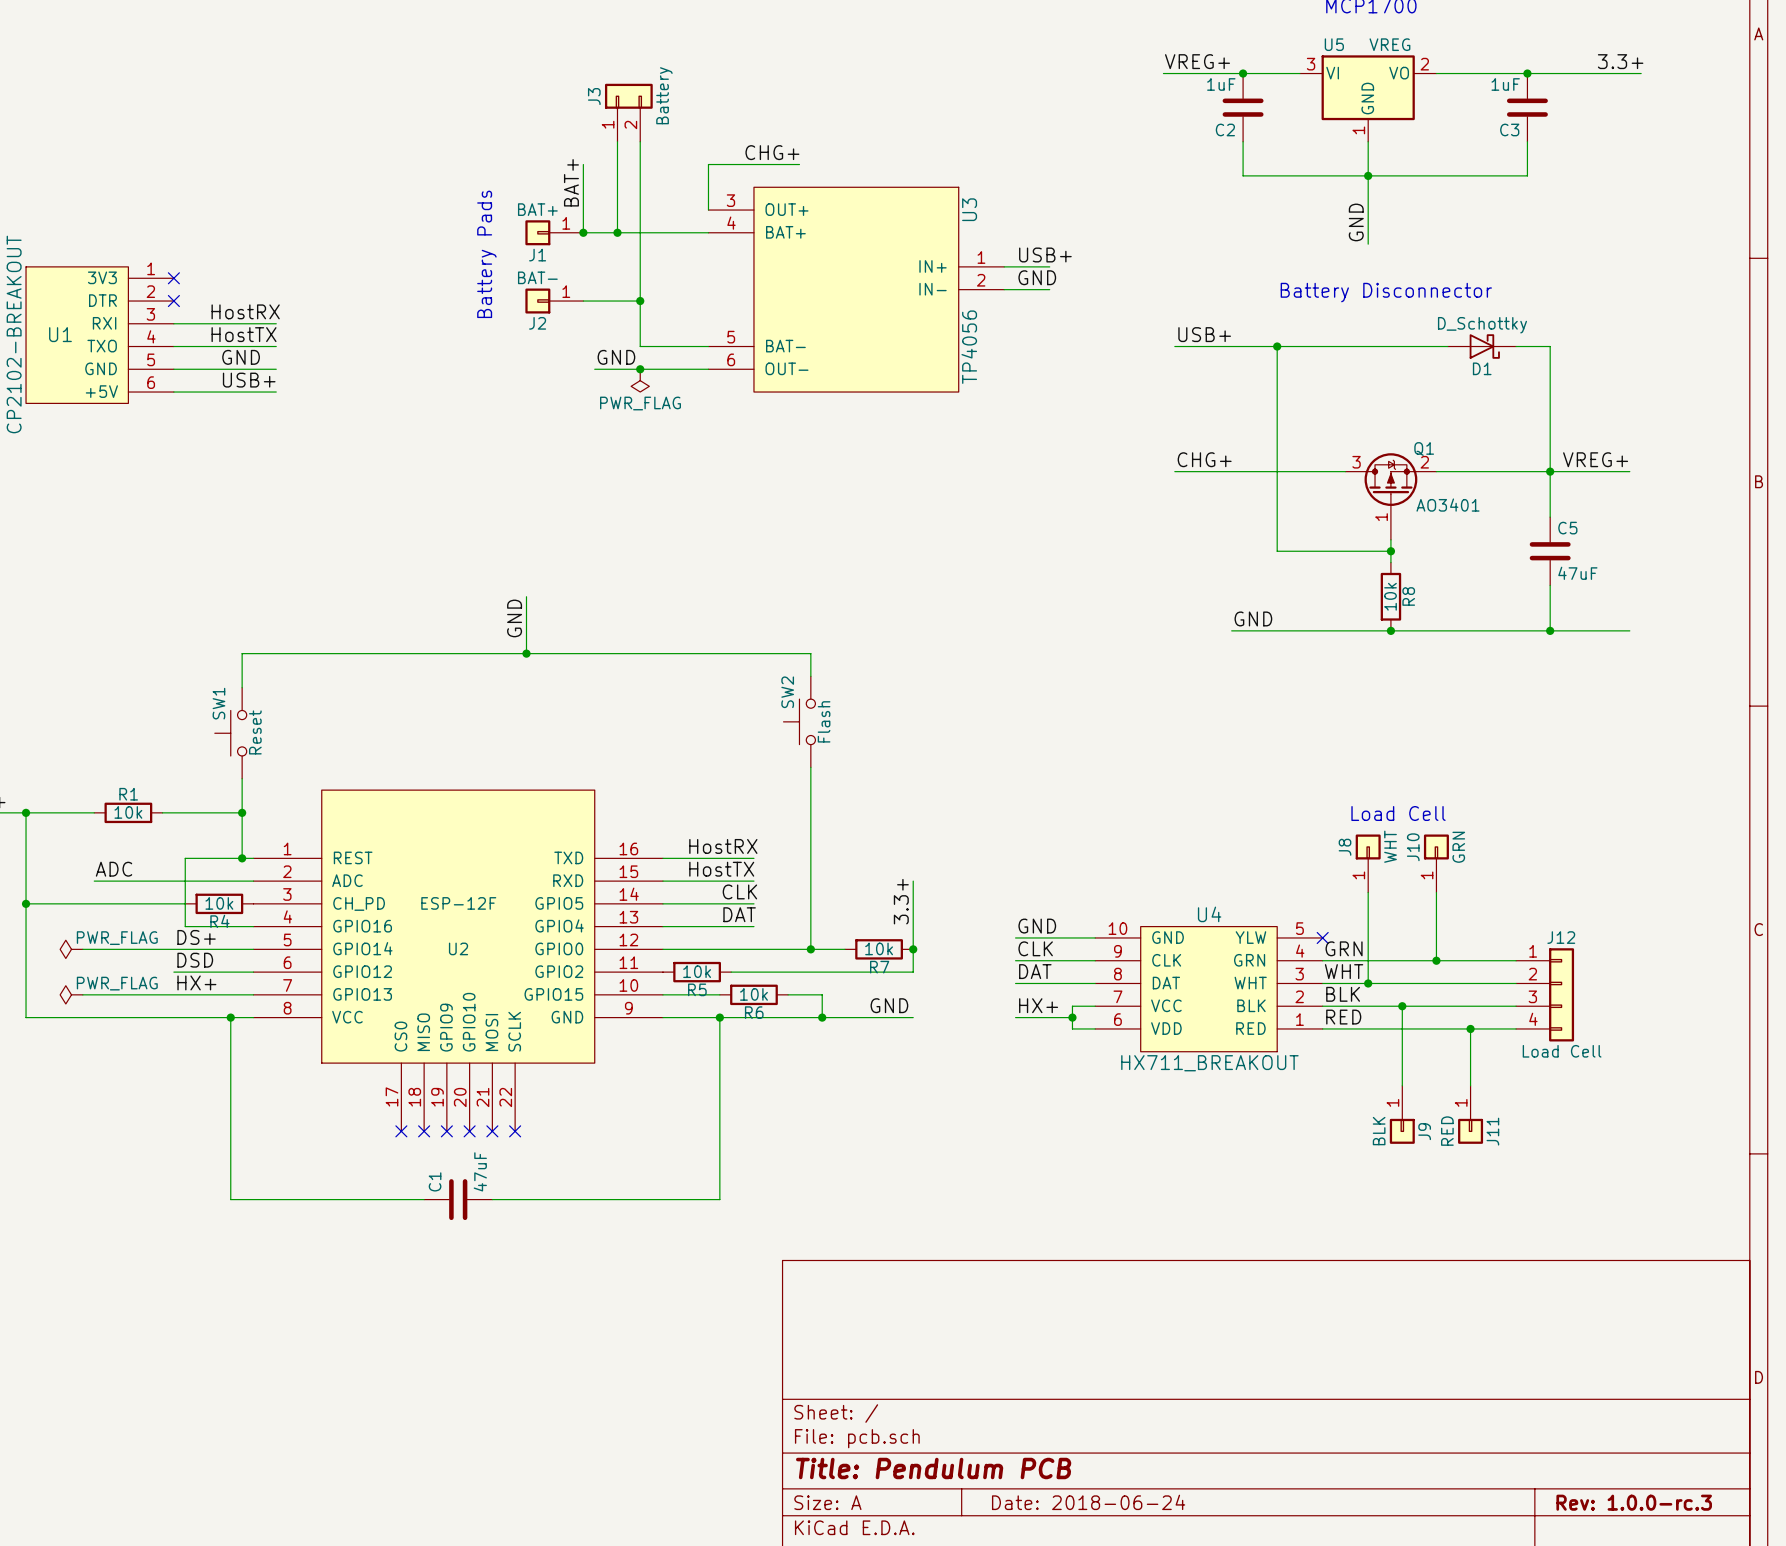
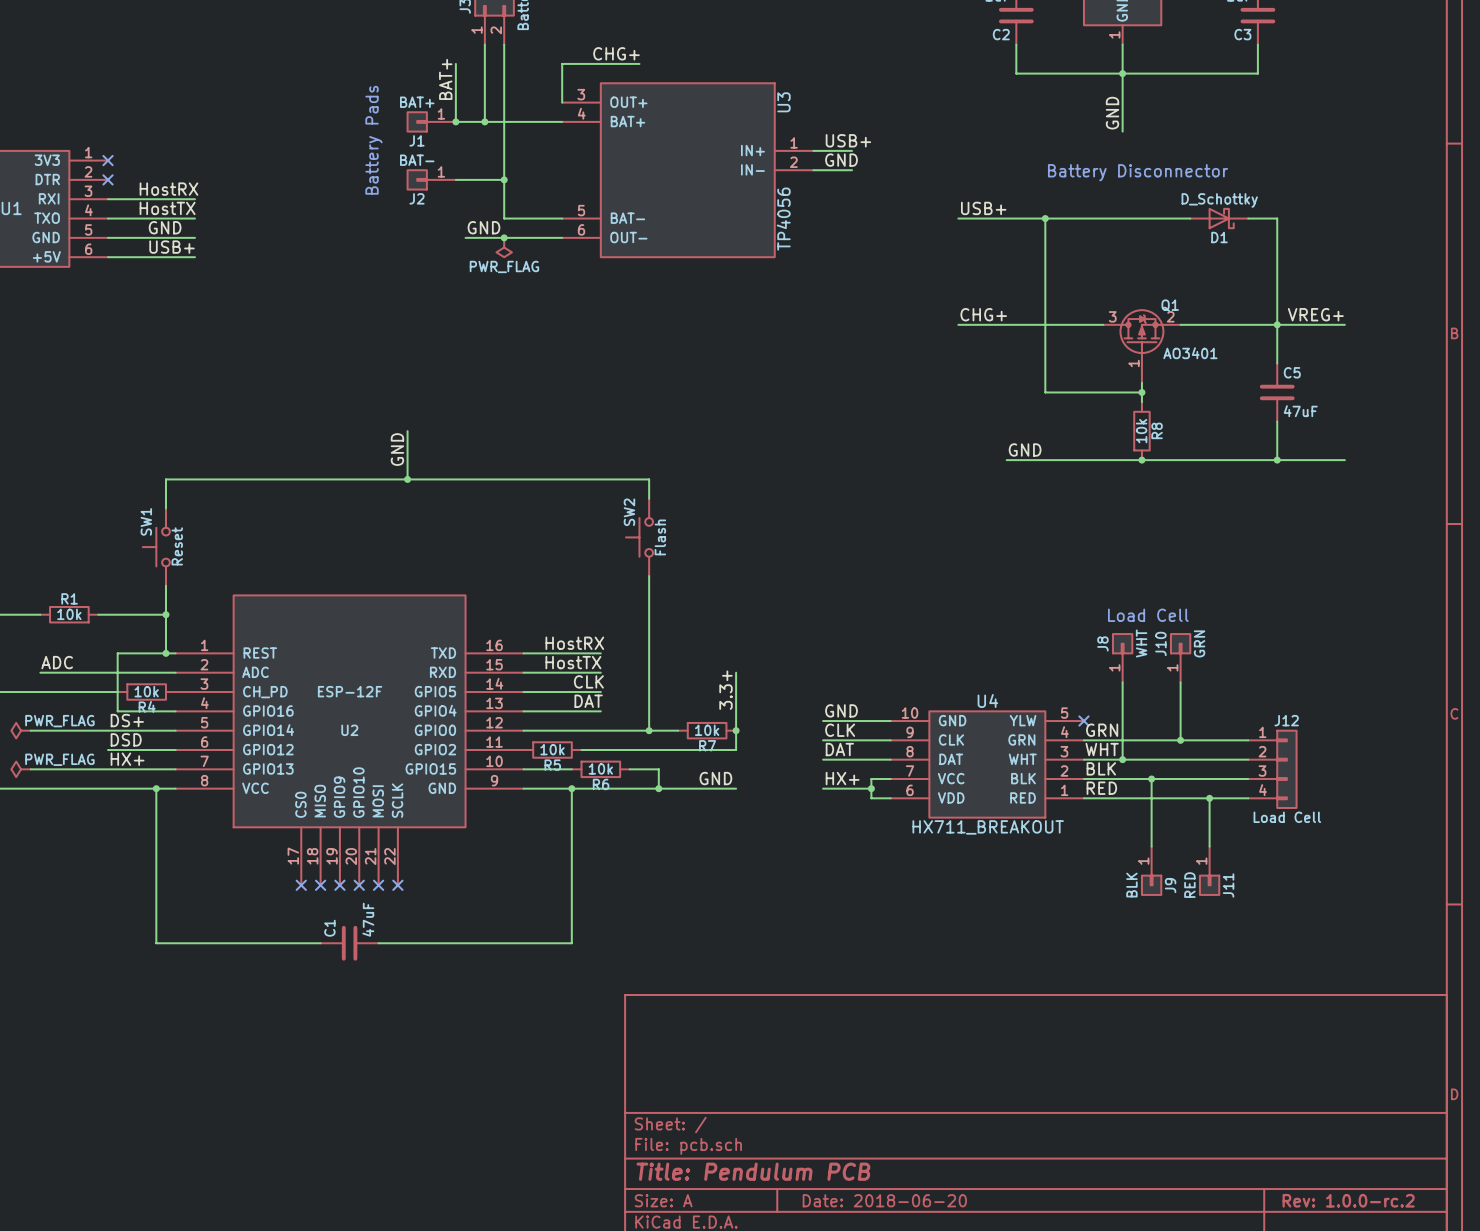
title block: Date: 2018-06-24 (1088, 1502) -> Date: 2018-06-20 (884, 1200)
title block: Rev: 1.0.0-rc.3 (1634, 1502) -> Rev: 1.0.0-rc.2 (1348, 1200)

